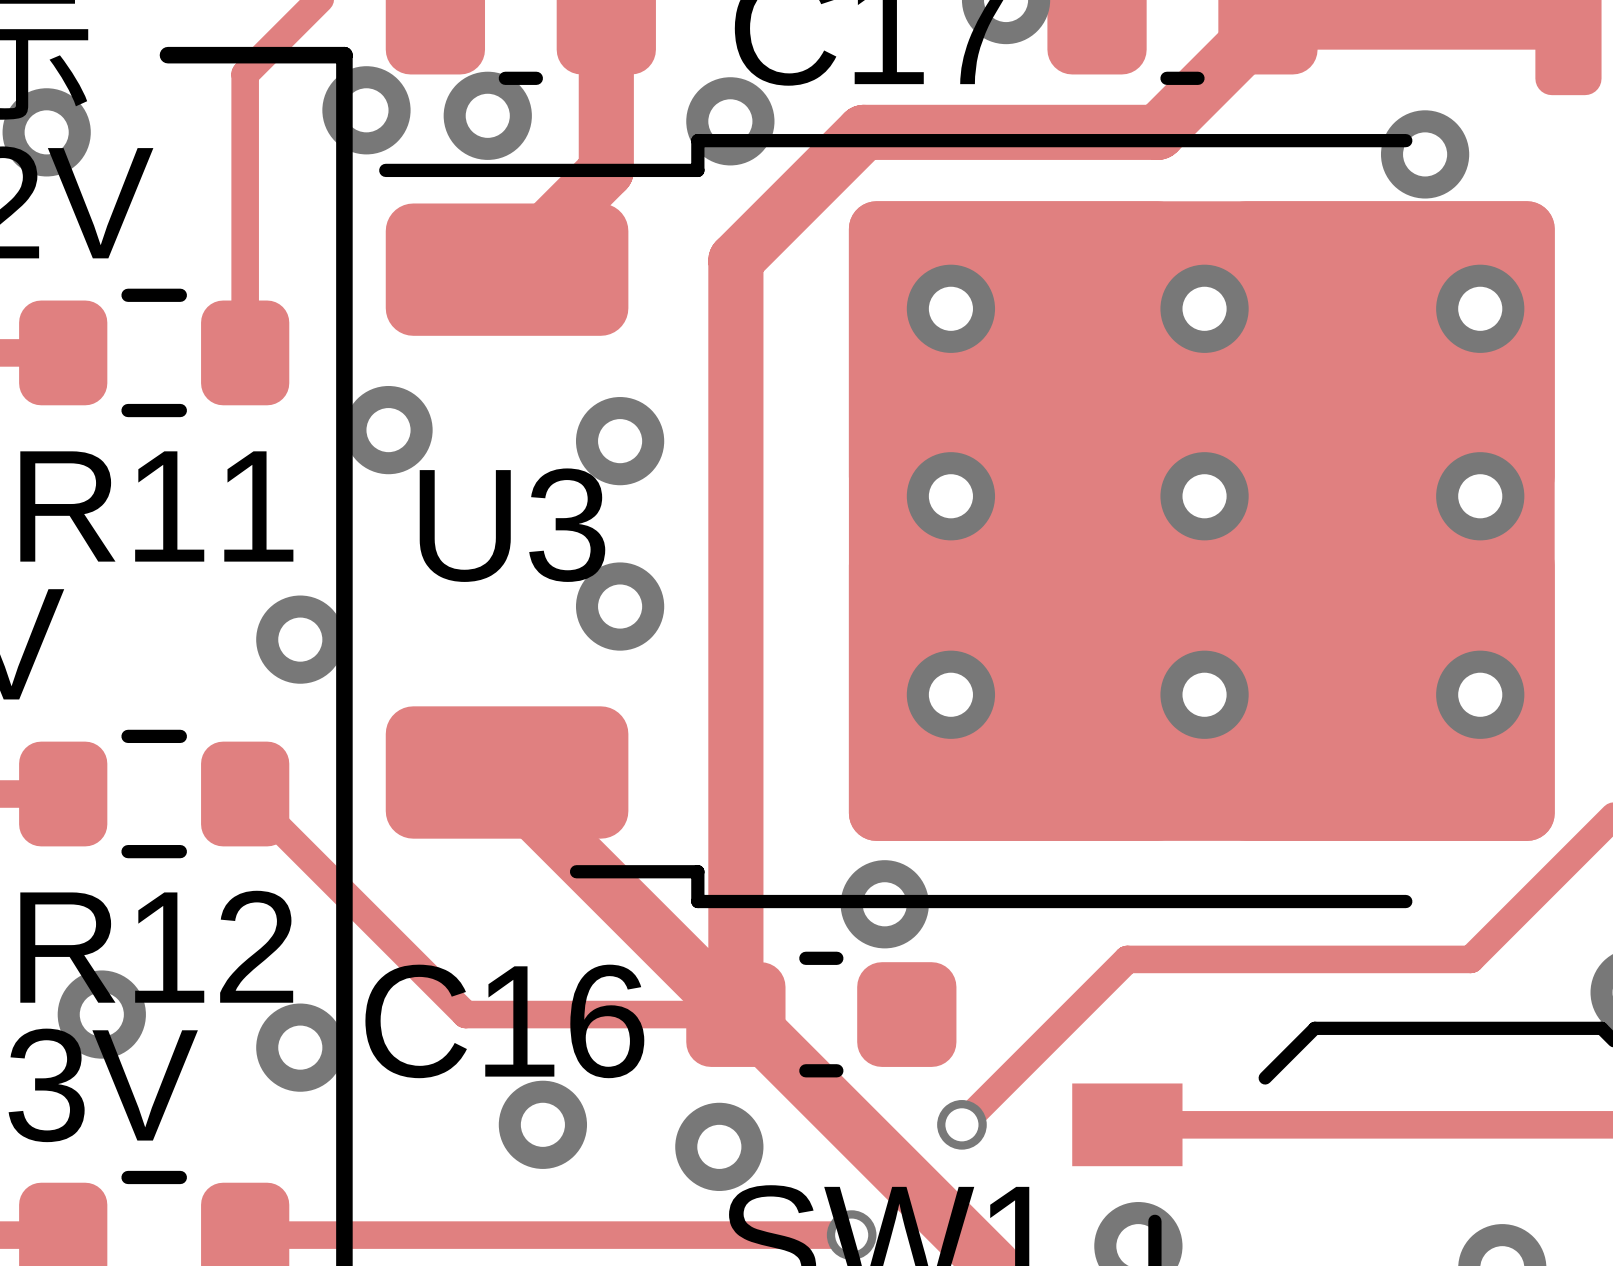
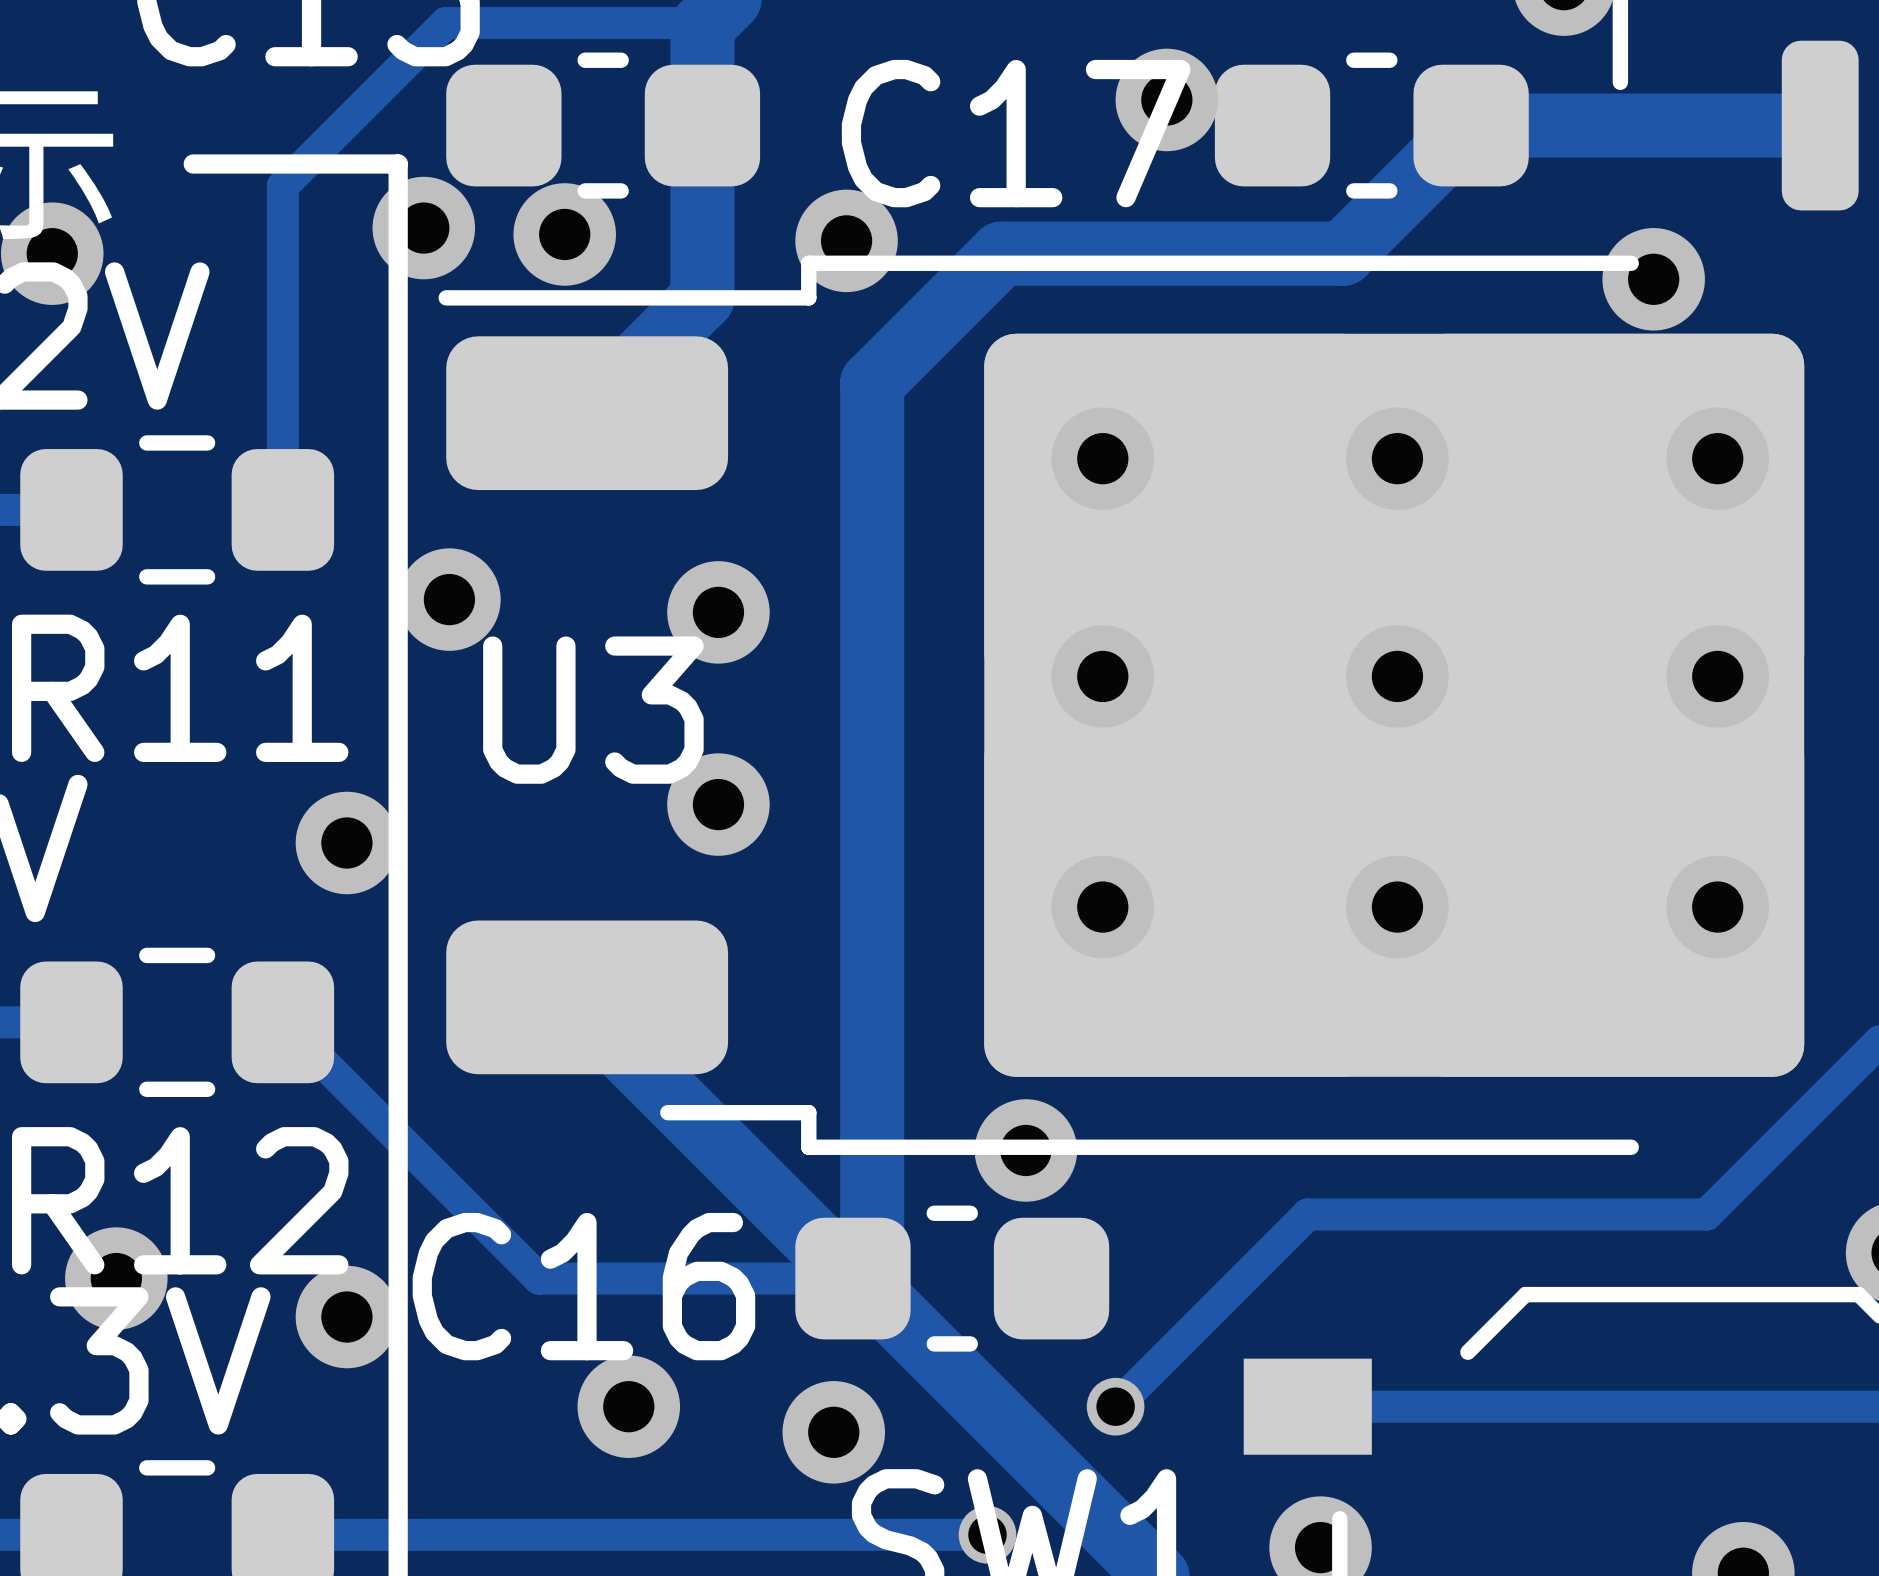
track: (752, 243) (735, 260) (735, 1014) -> (872, 383) (872, 1259) (852, 1278)

